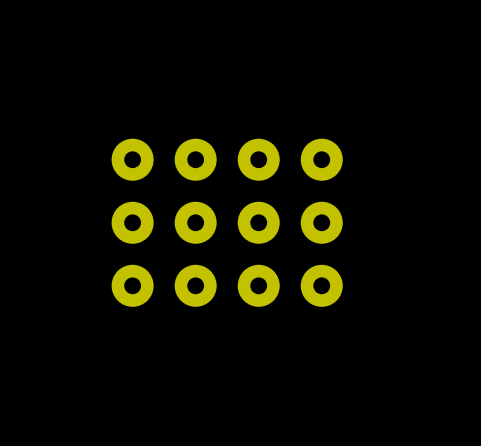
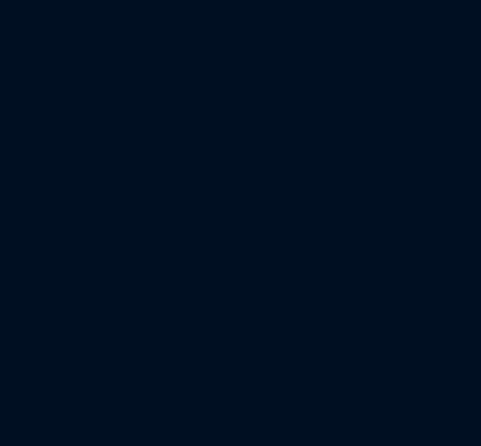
part: (227, 222) -> none

